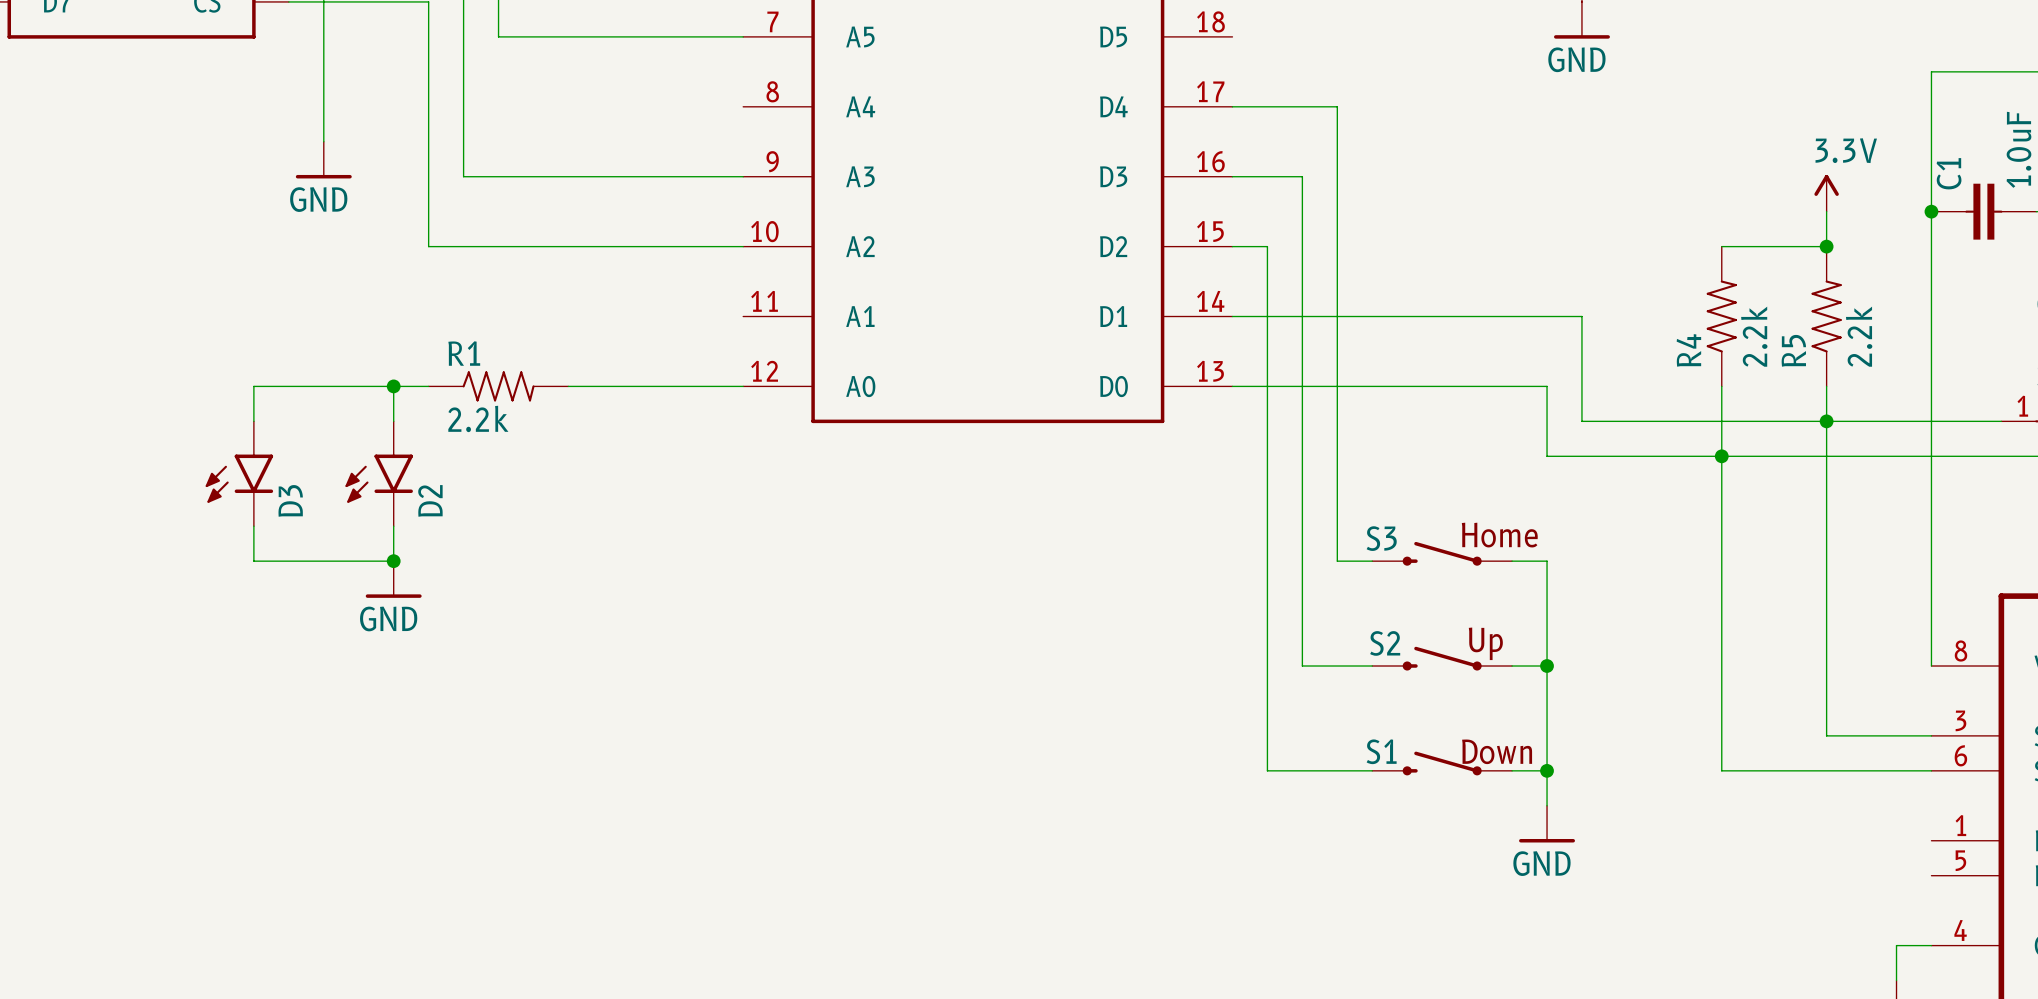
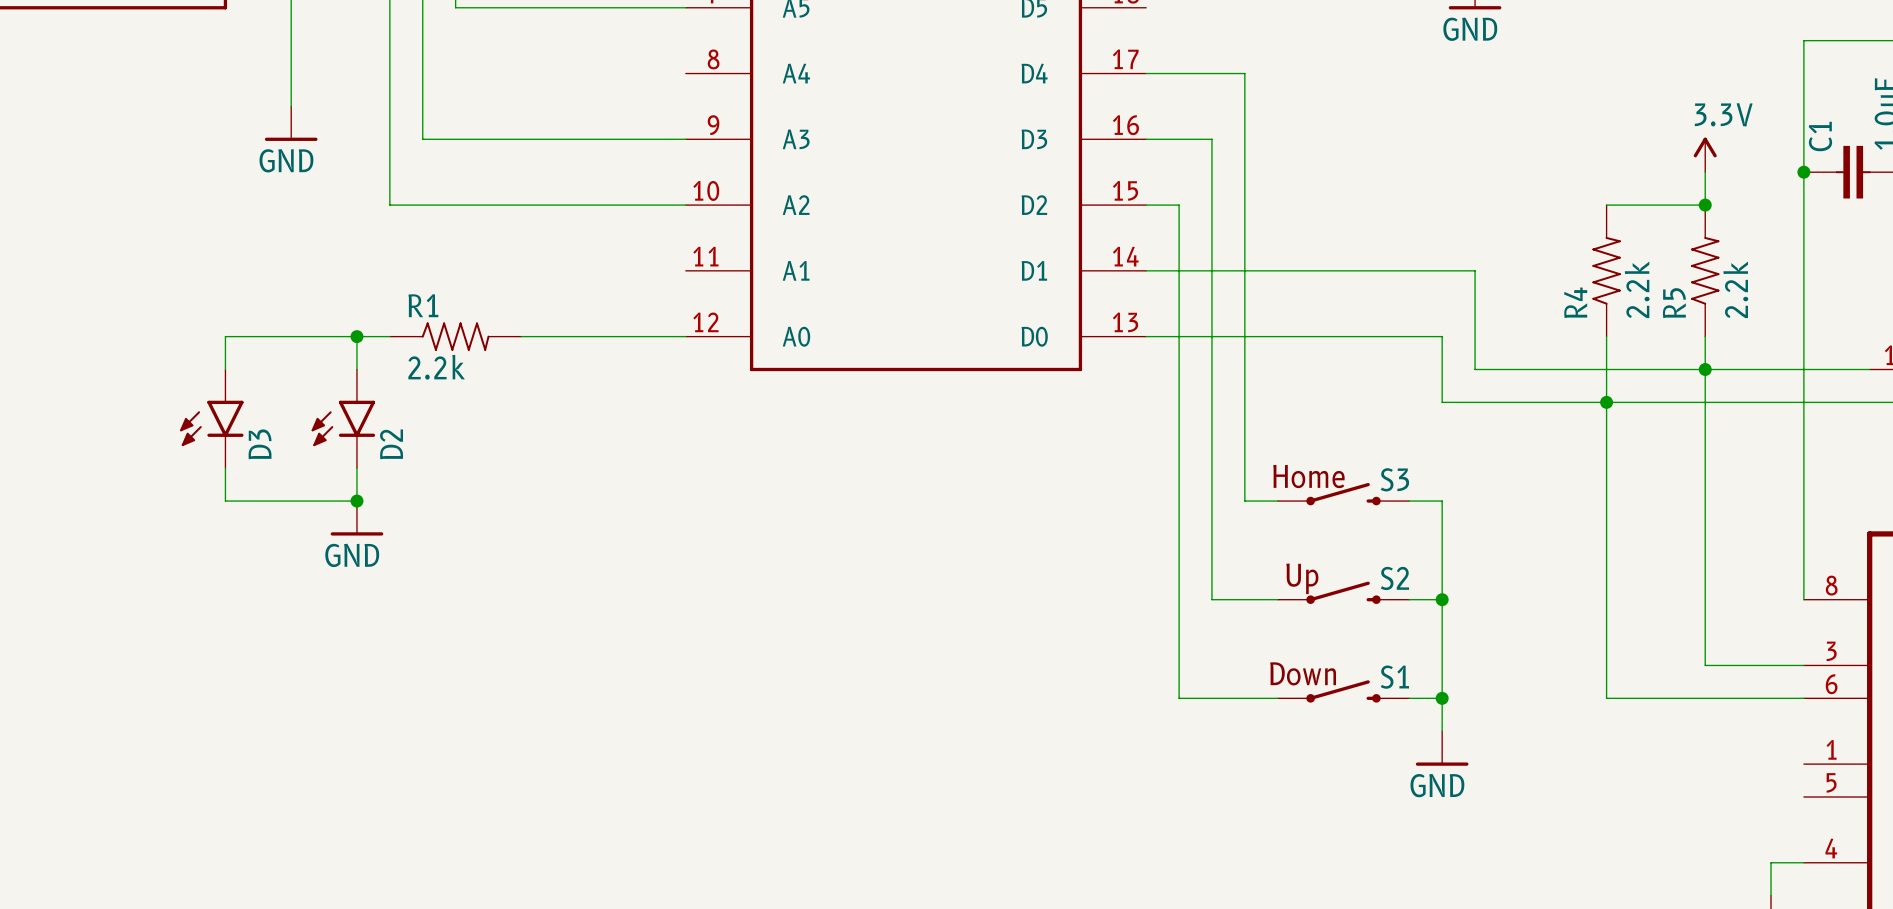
text position: Home (1499, 535) -> Home (1308, 476)
S3 flip: as is (1442, 553) -> left-right (1343, 494)
text position: Up (1485, 643) -> Up (1302, 578)
S2 flip: as is (1442, 658) -> left-right (1343, 592)
text position: Down (1497, 751) -> Down (1303, 673)
S1 flip: as is (1442, 763) -> left-right (1343, 691)

